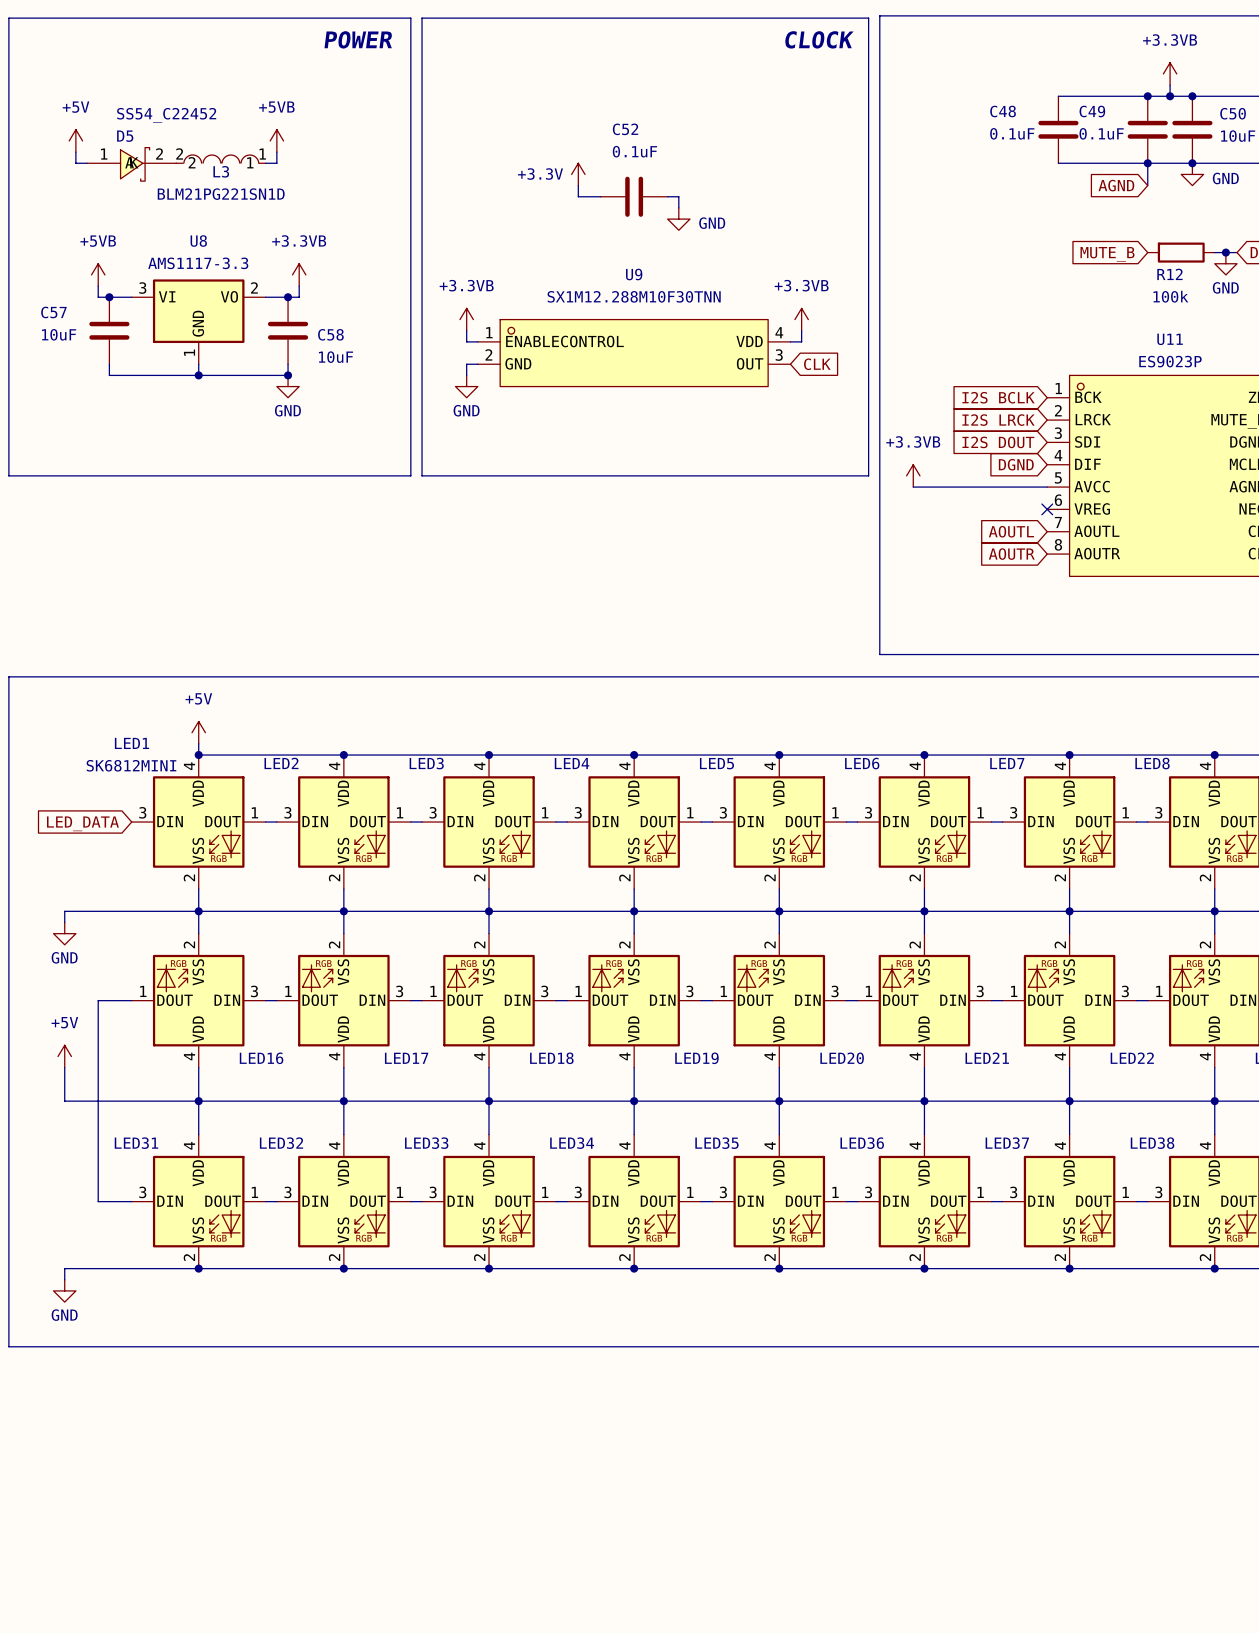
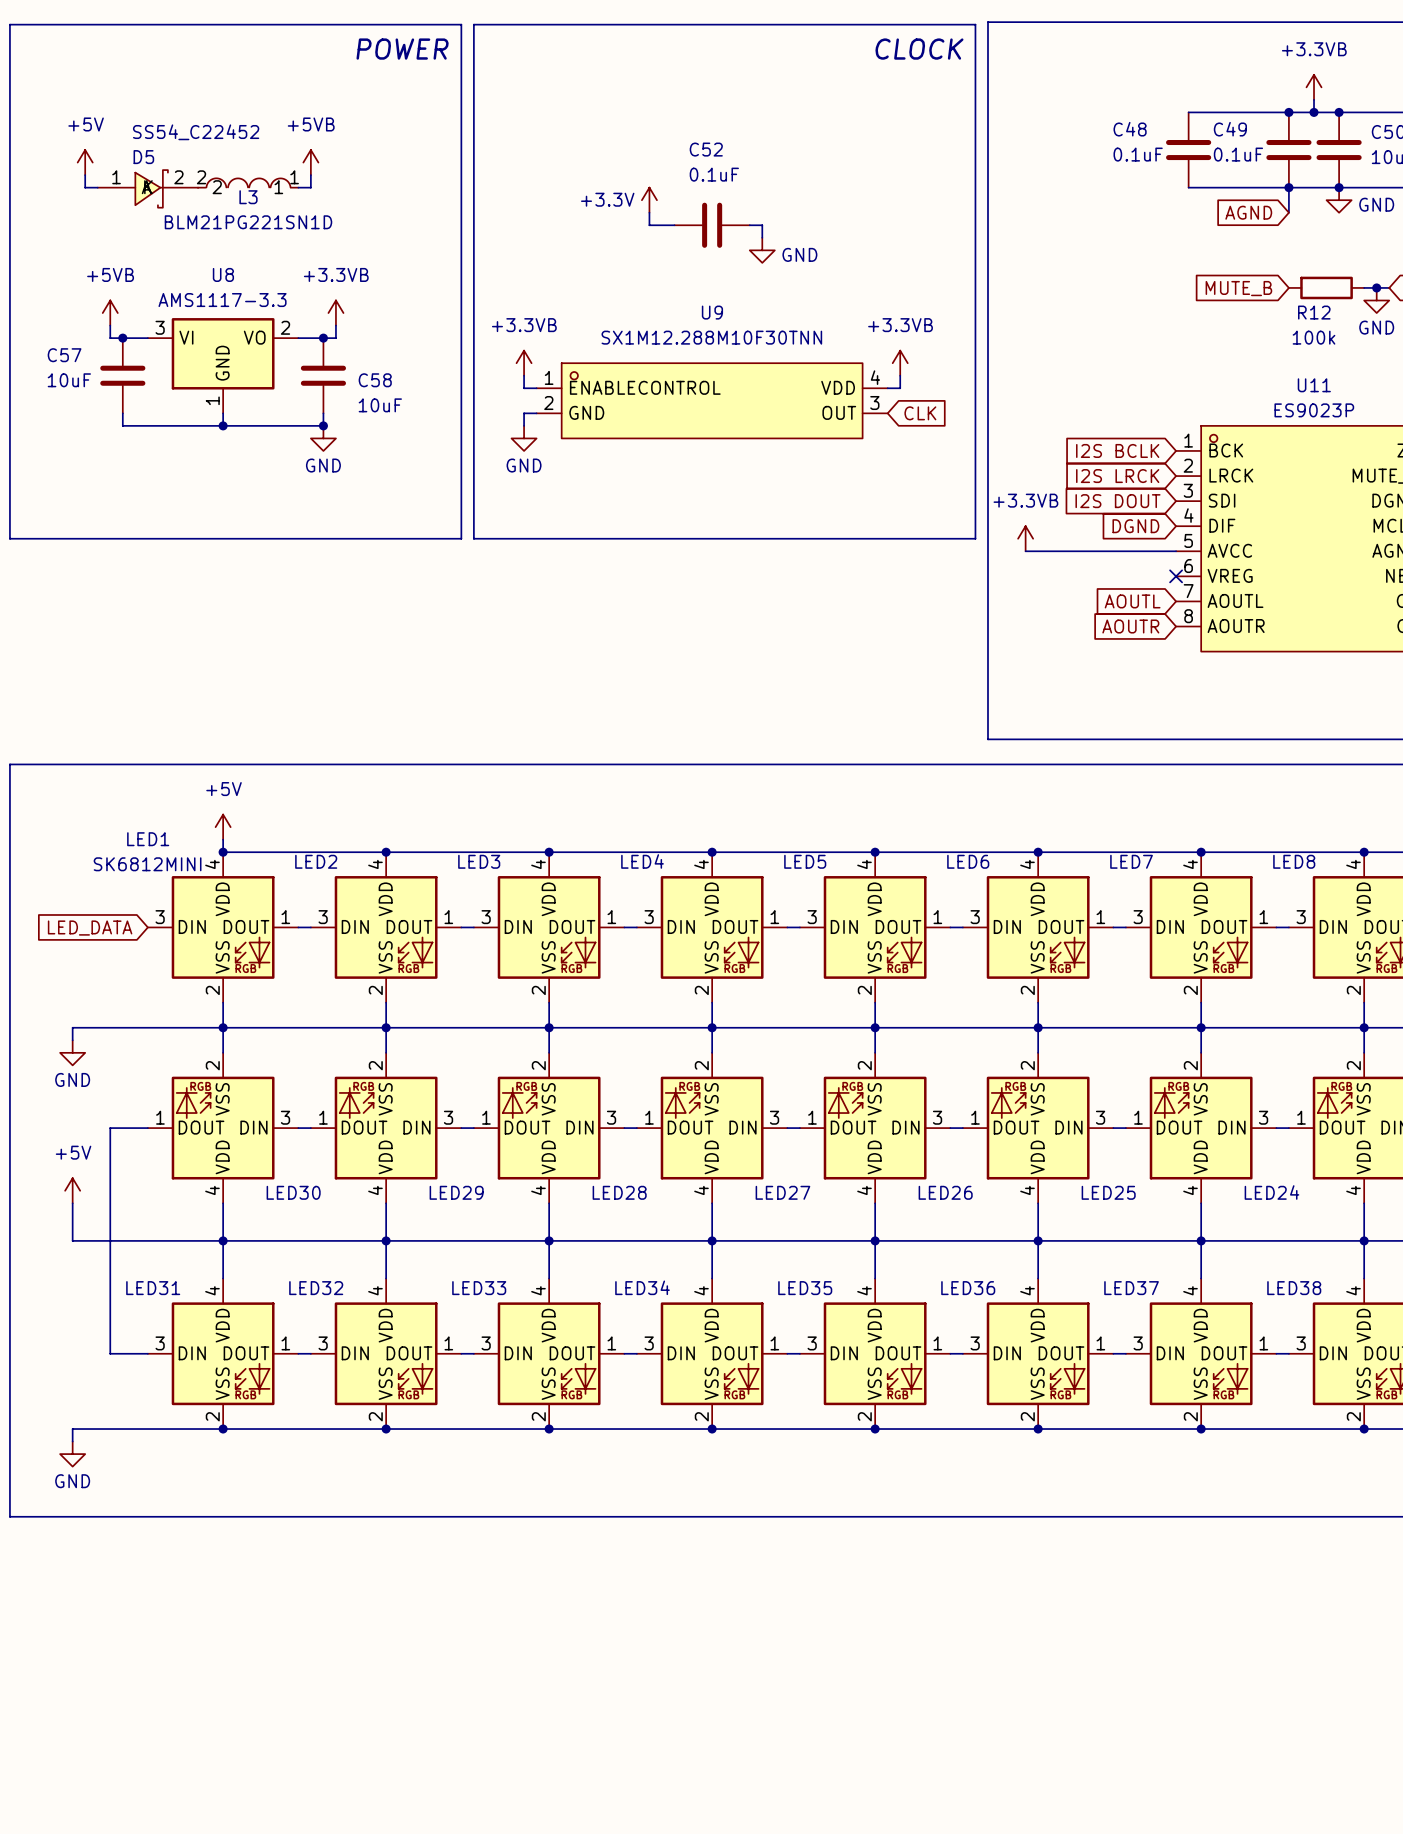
LED16 name: LED16 (261, 1058) -> LED30 (293, 1192)
LED17 name: LED17 (406, 1058) -> LED29 (456, 1192)
LED18 name: LED18 (551, 1058) -> LED28 (619, 1192)
LED19 name: LED19 (696, 1058) -> LED27 (782, 1192)
LED20 name: LED20 (842, 1058) -> LED26 (945, 1192)
LED21 name: LED21 (987, 1058) -> LED25 (1108, 1192)
LED22 name: LED22 (1132, 1058) -> LED24 (1271, 1192)

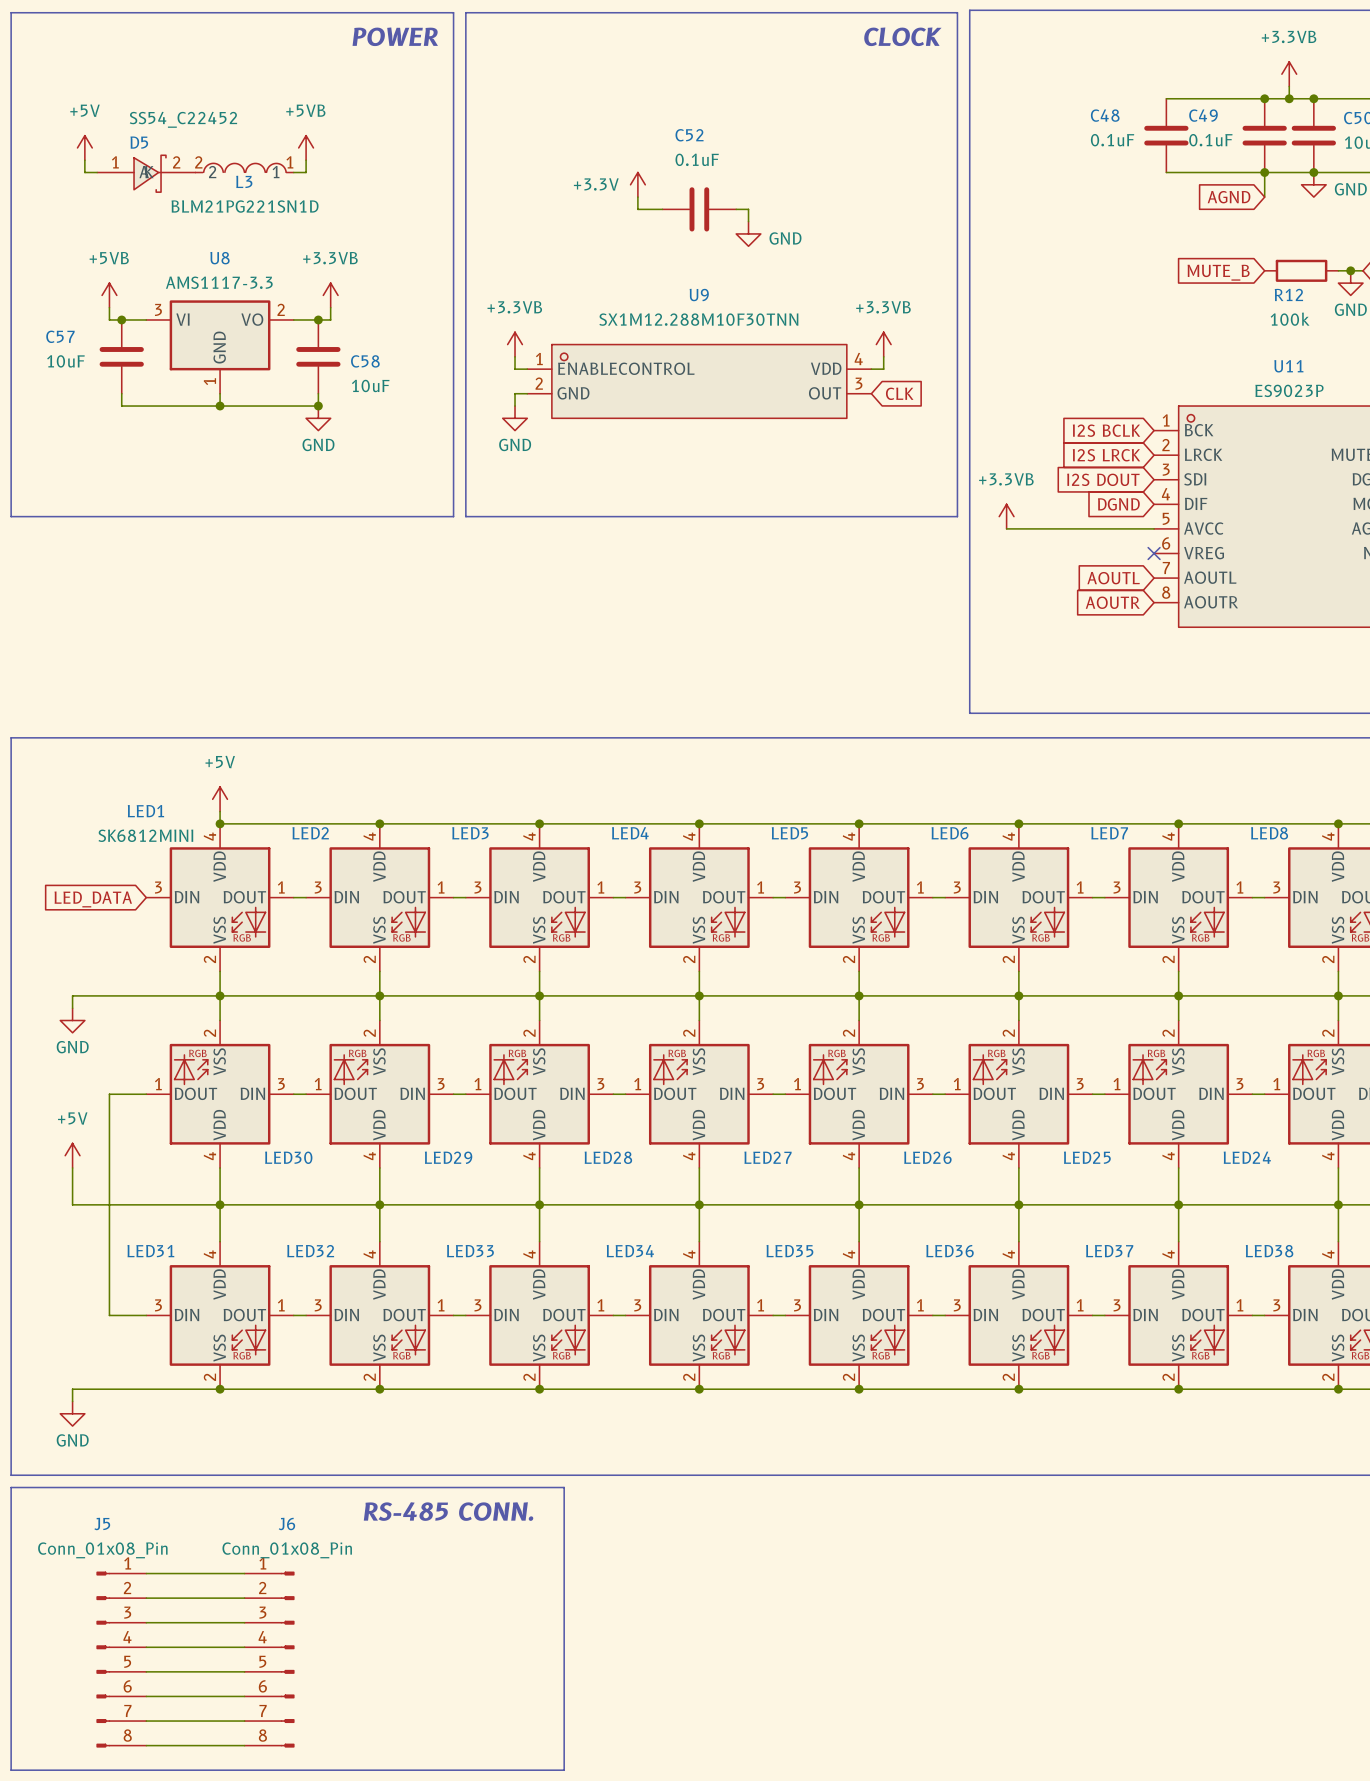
line: none -> (11, 1487) (564, 1487) (564, 1770) (11, 1770) (11, 1487)
text: none -> RS-485 CONN. (448, 1511)
wire: none -> (146, 1573) (244, 1573)
wire: none -> (146, 1598) (244, 1598)
wire: none -> (146, 1622) (244, 1622)
wire: none -> (146, 1647) (244, 1647)
J5: none -> Conn_01x08_Pin (121, 1659)
J6: none -> Conn_01x08_Pin (269, 1659)
wire: none -> (146, 1671) (244, 1671)
wire: none -> (146, 1696) (244, 1696)
wire: none -> (146, 1721) (244, 1721)
wire: none -> (146, 1745) (244, 1745)

